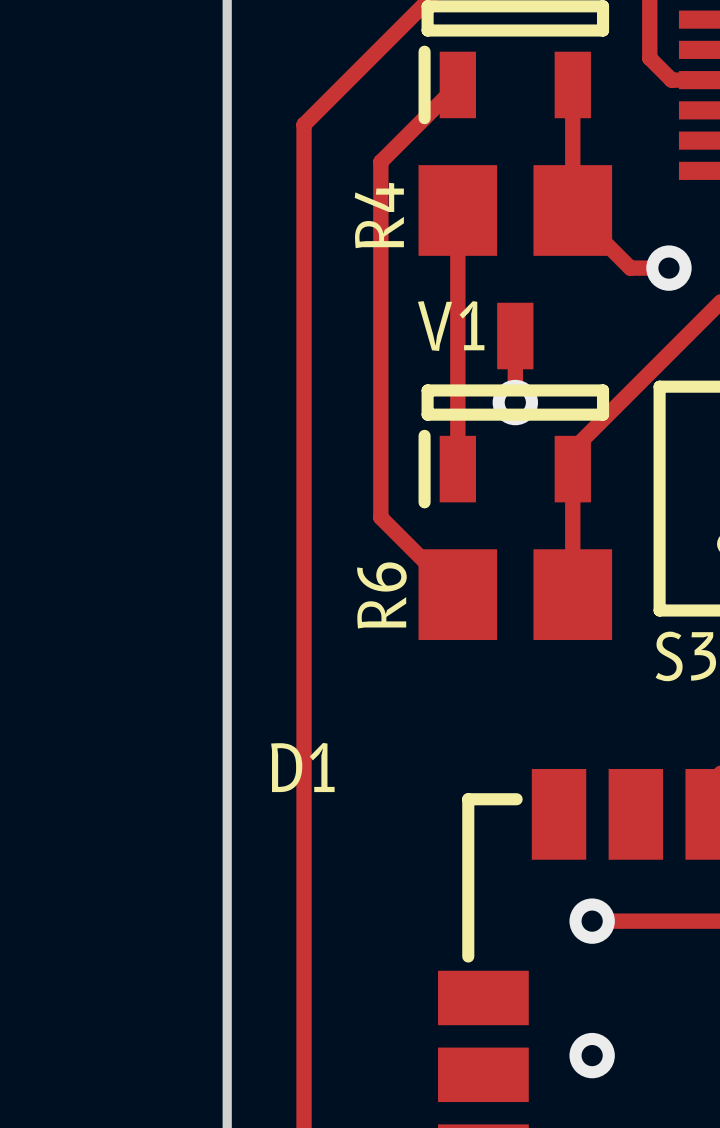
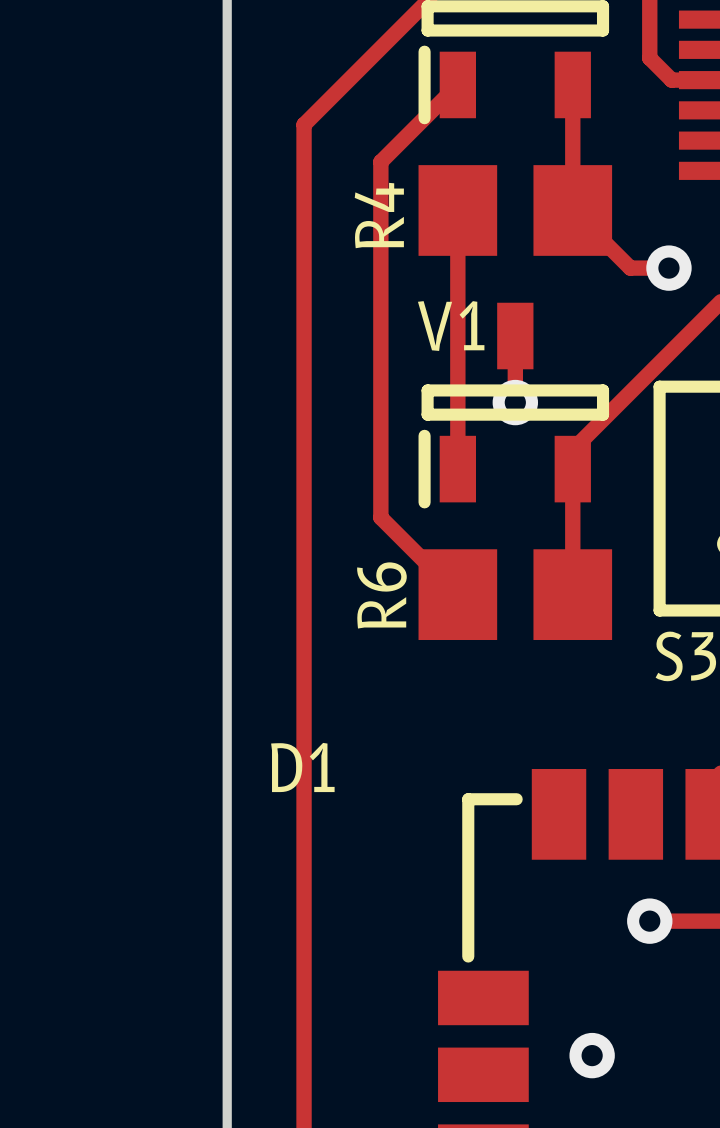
track: (592, 921) (649, 921) -> none
via position: (592, 921) -> (649, 921)

